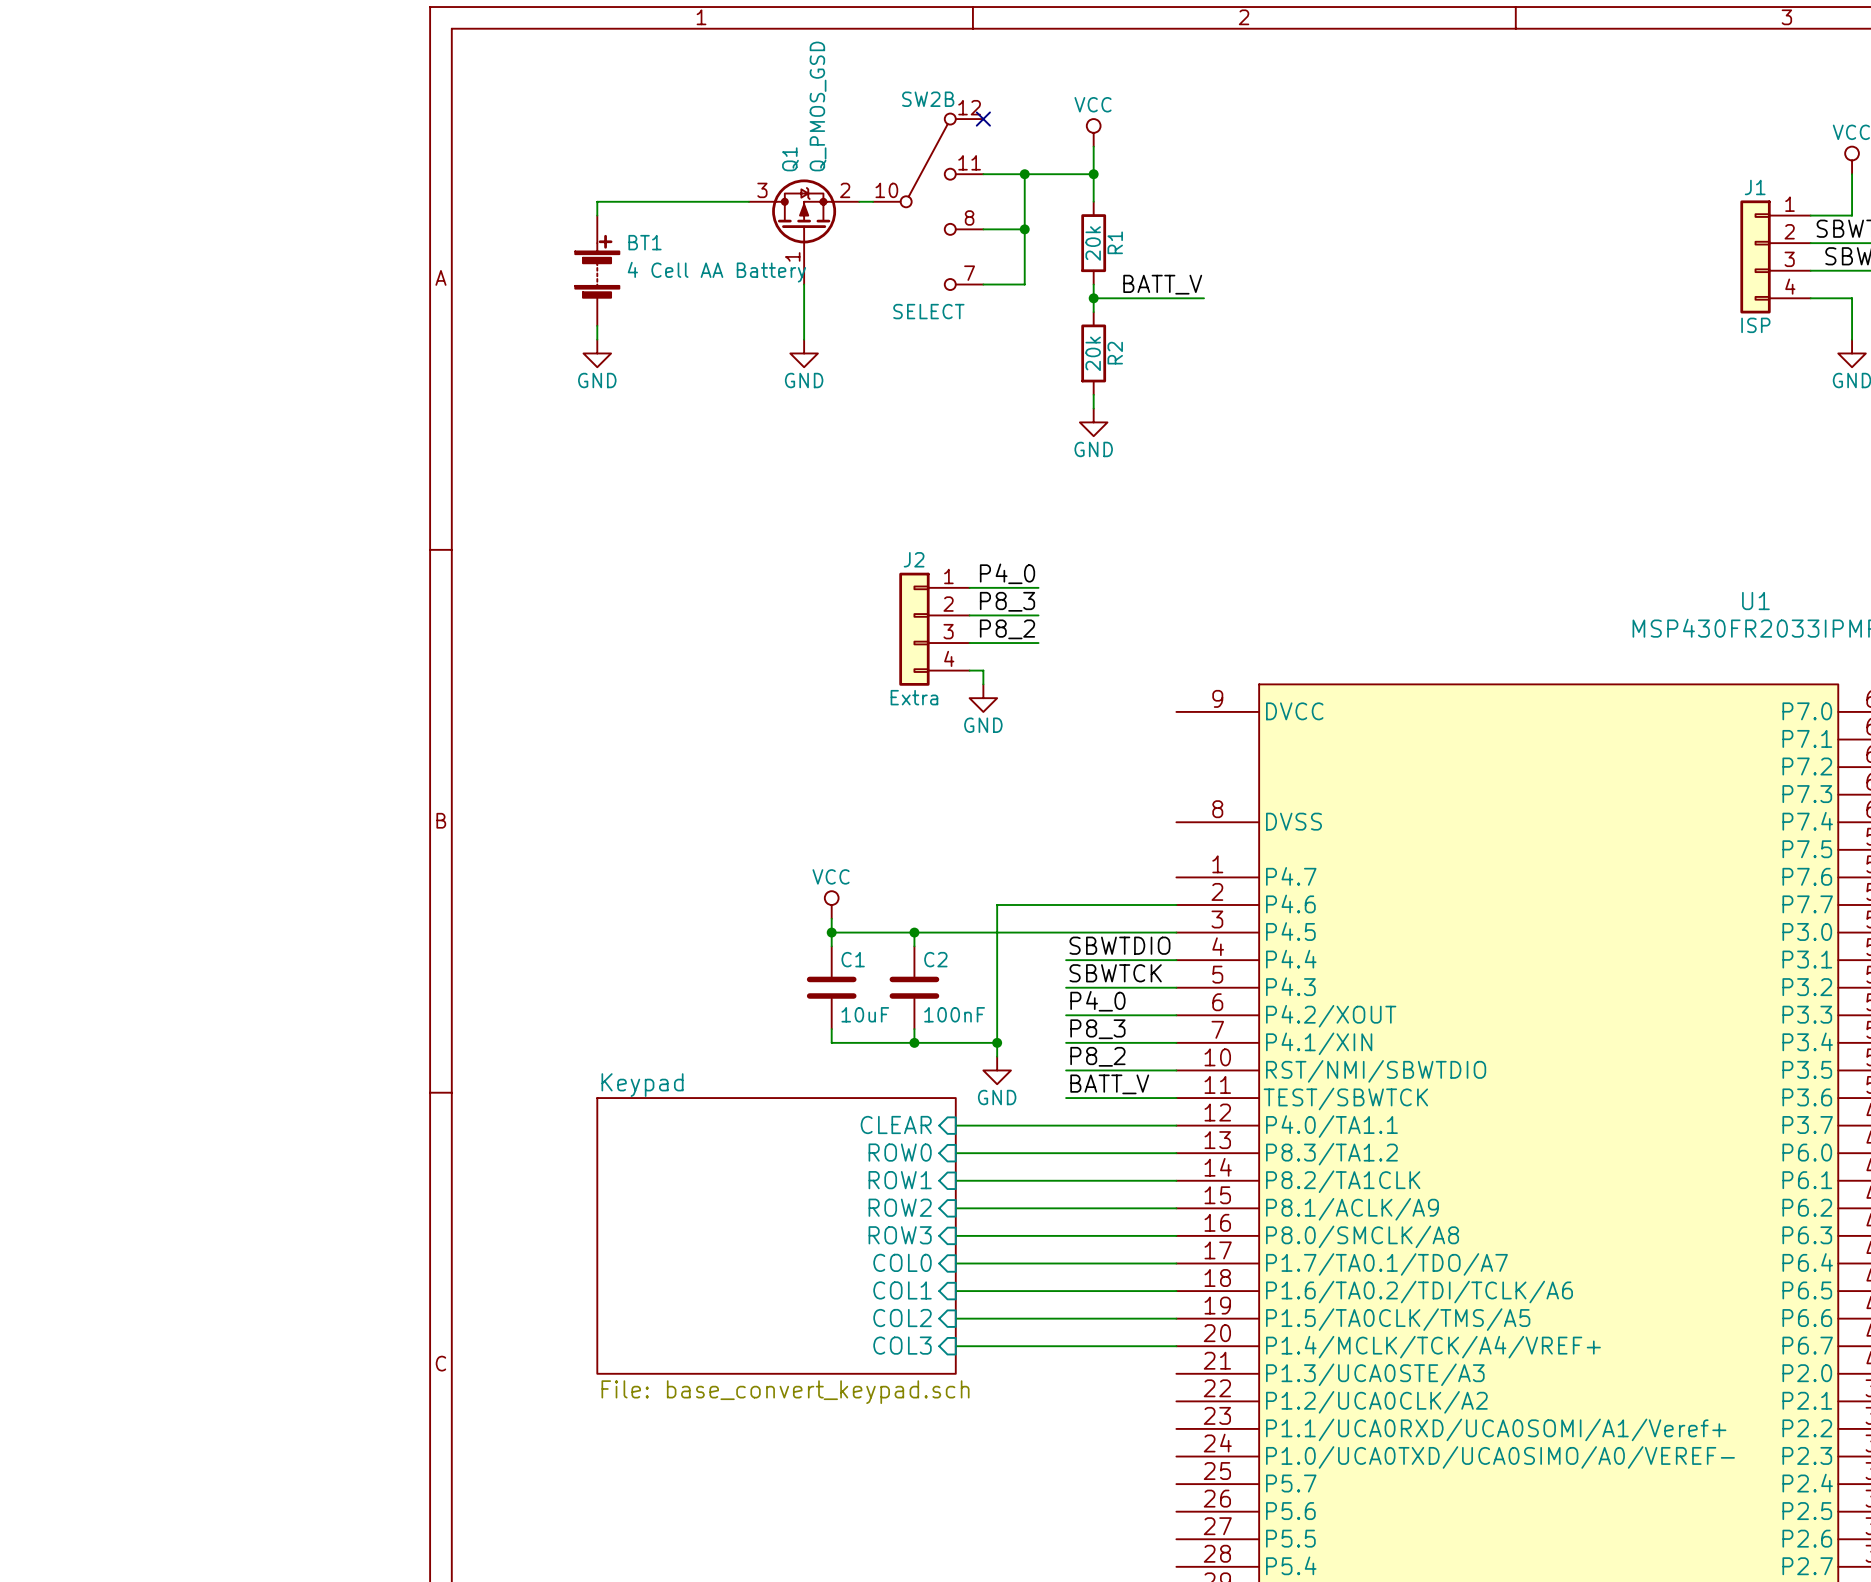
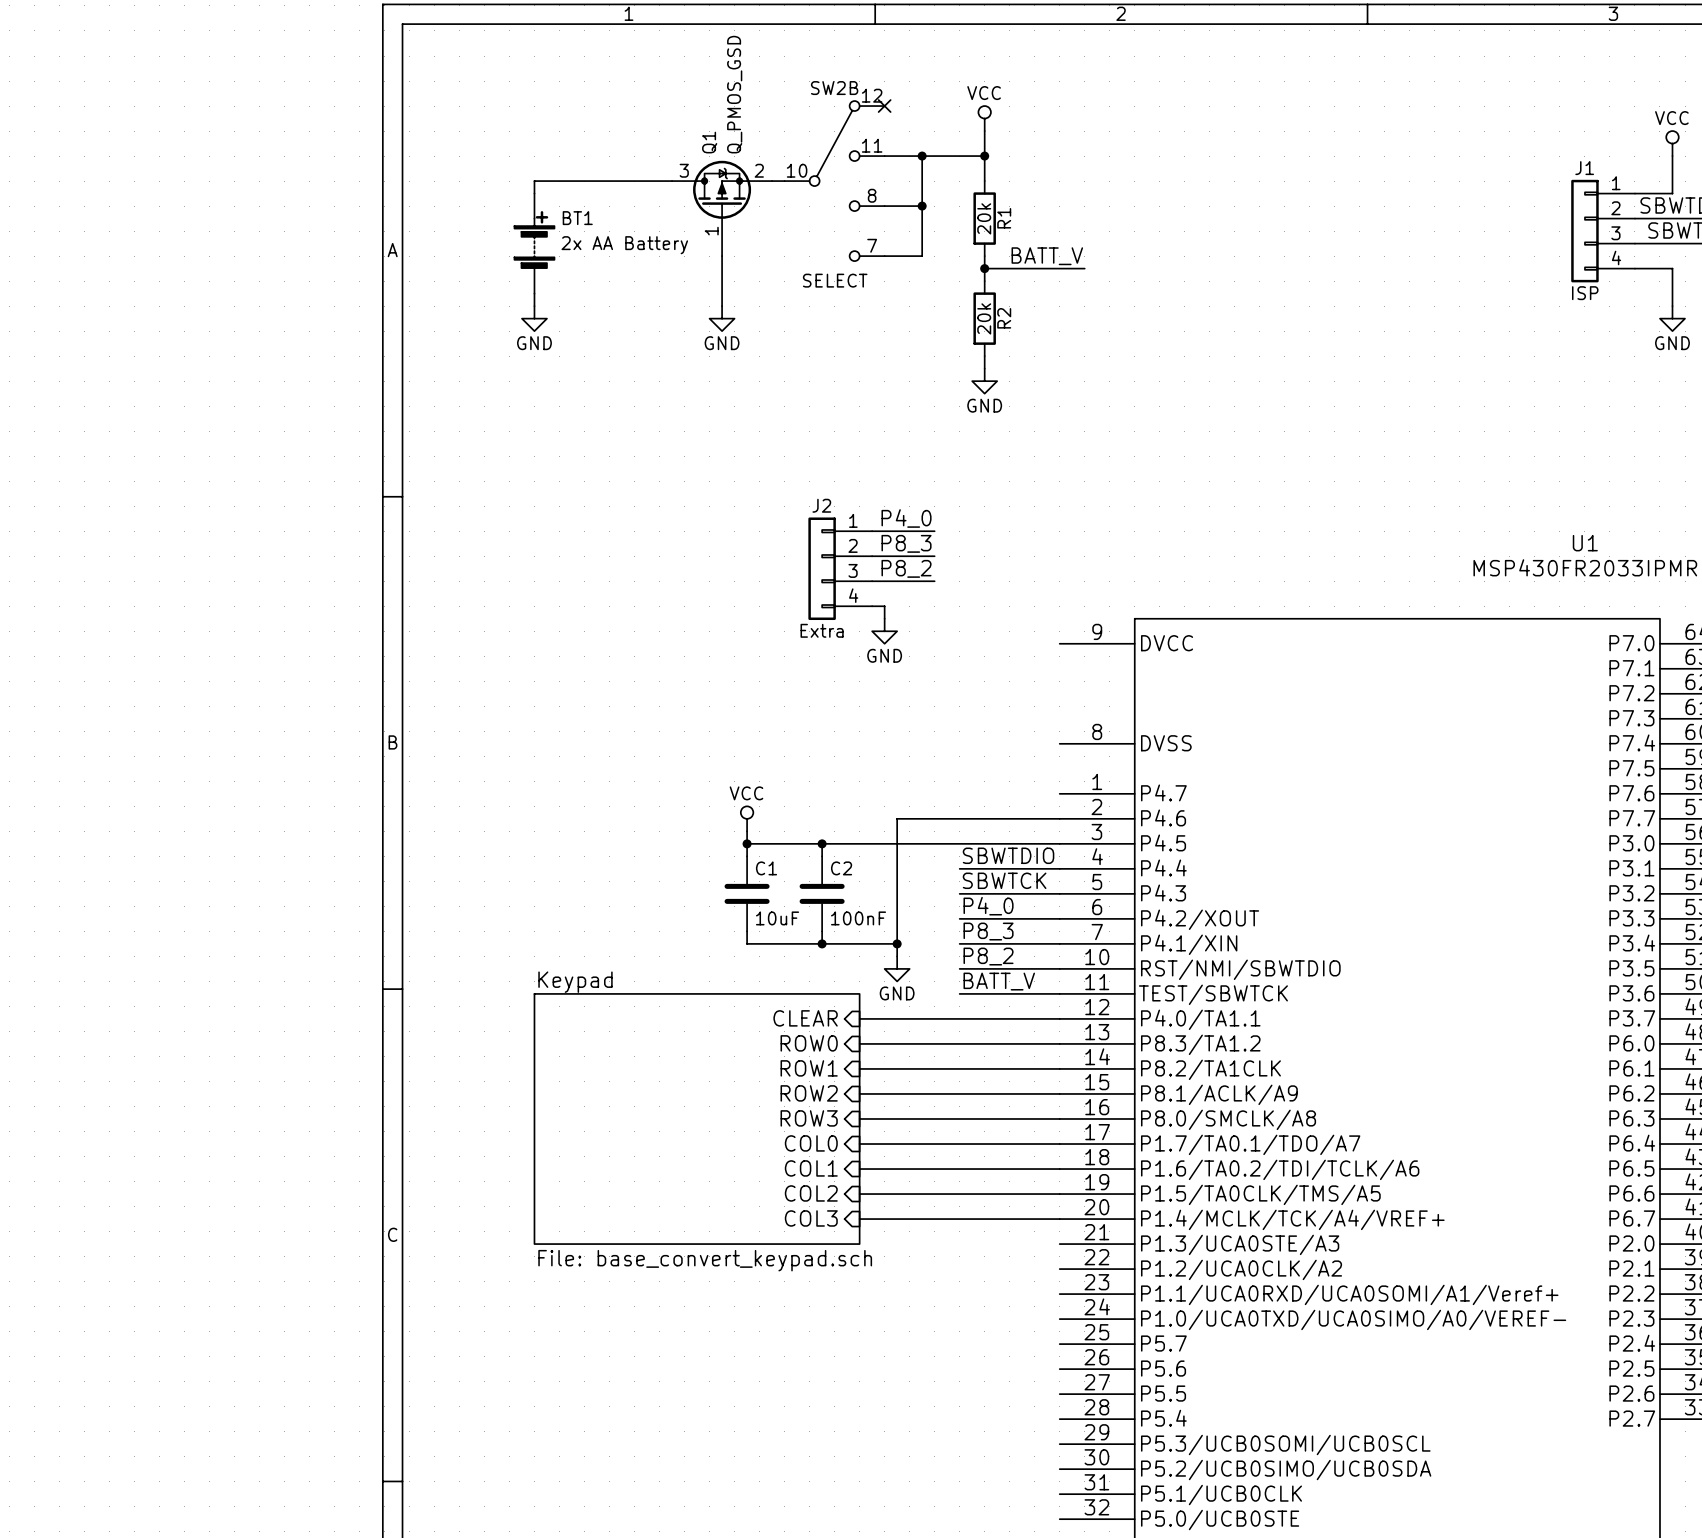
BT1 value: 4 Cell AA Battery (716, 272) -> 2x AA Battery (624, 245)

